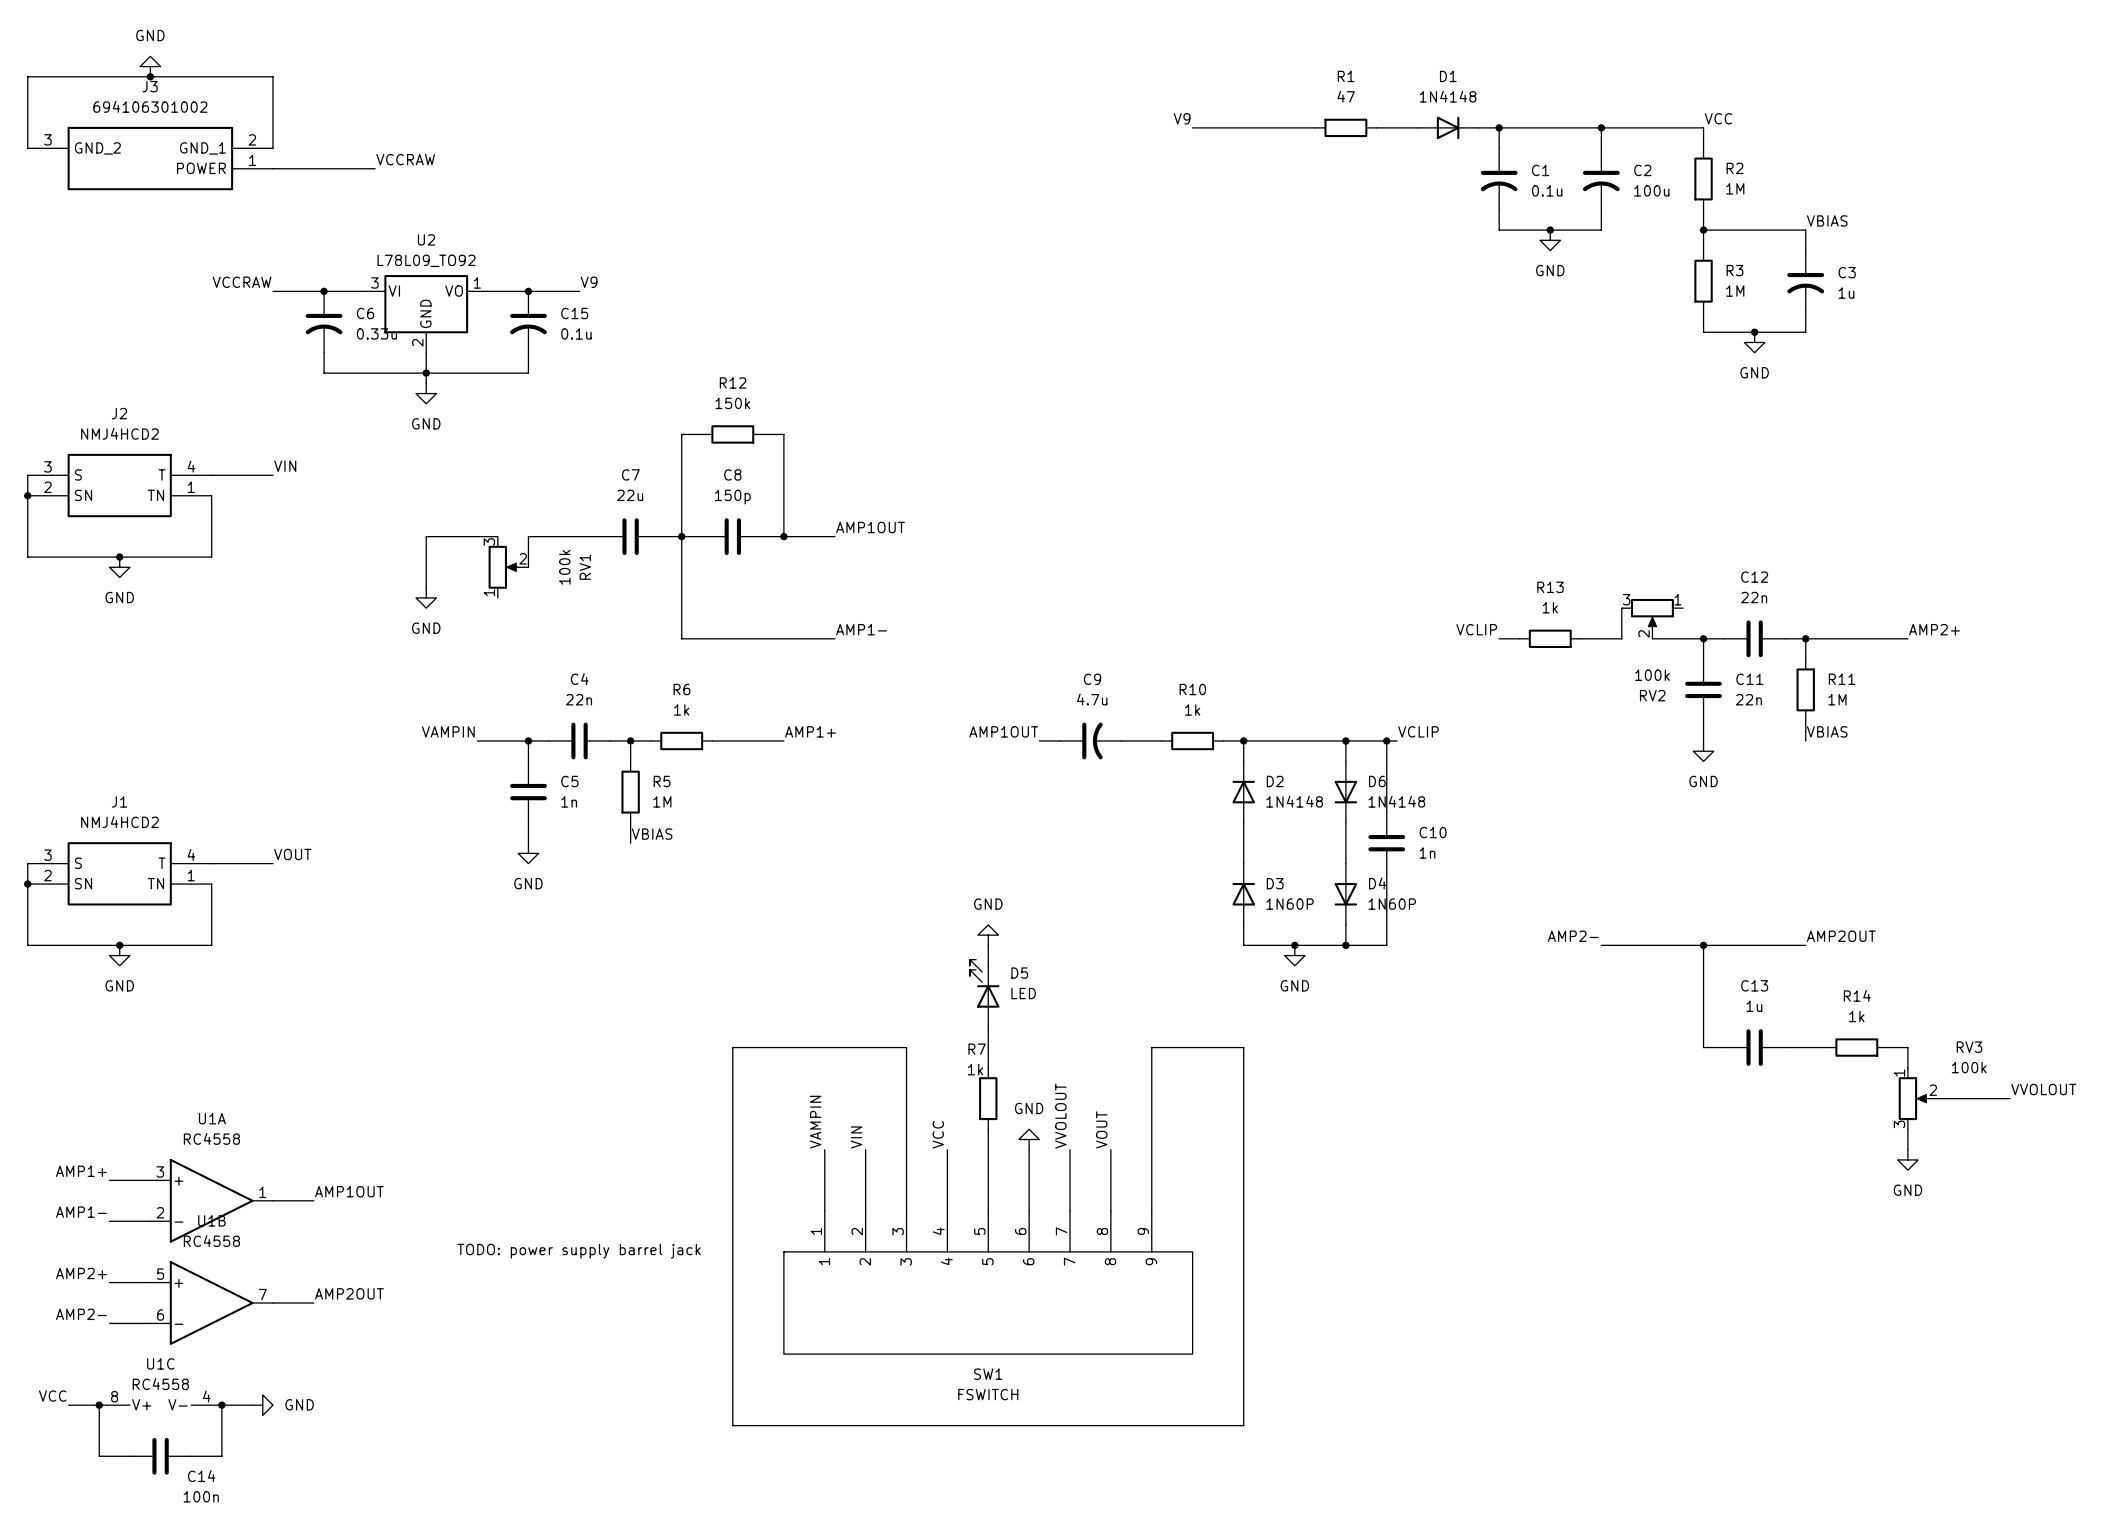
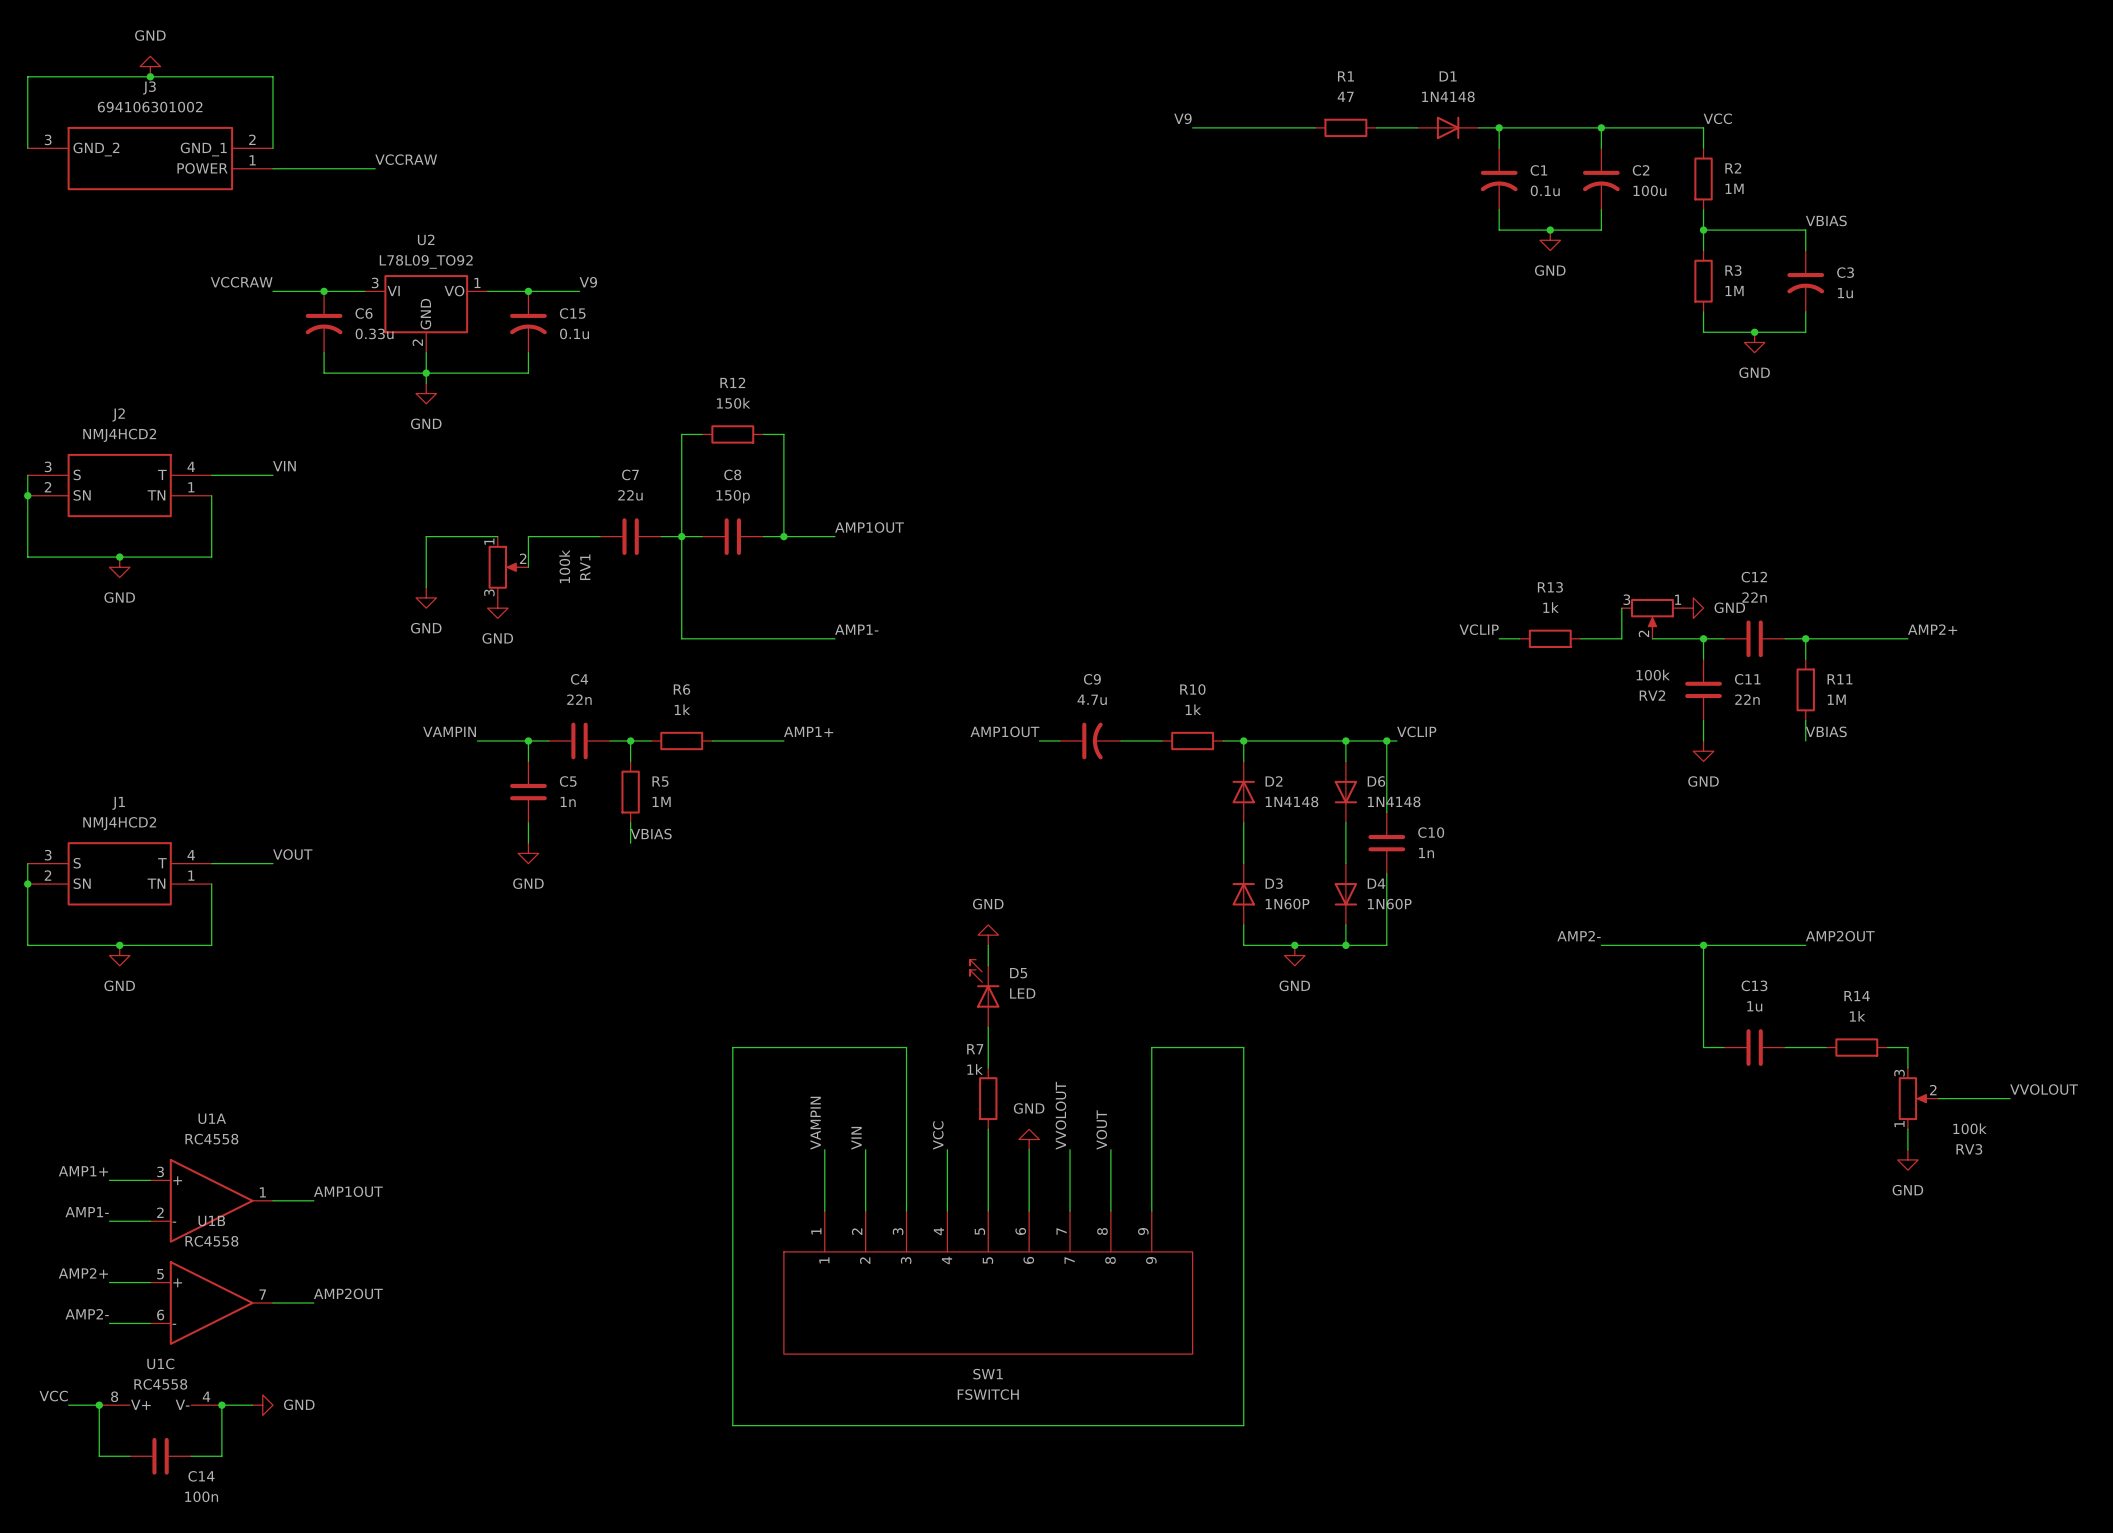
RV1 flip: as is (503, 567) -> up-down (503, 567)
power symbol: none -> GND (497, 608)
power symbol: none -> GND (1693, 608)
RV3 flip: as is (1913, 1098) -> up-down (1913, 1098)
text: TODO: power supply barrel jack (579, 1251) -> none

